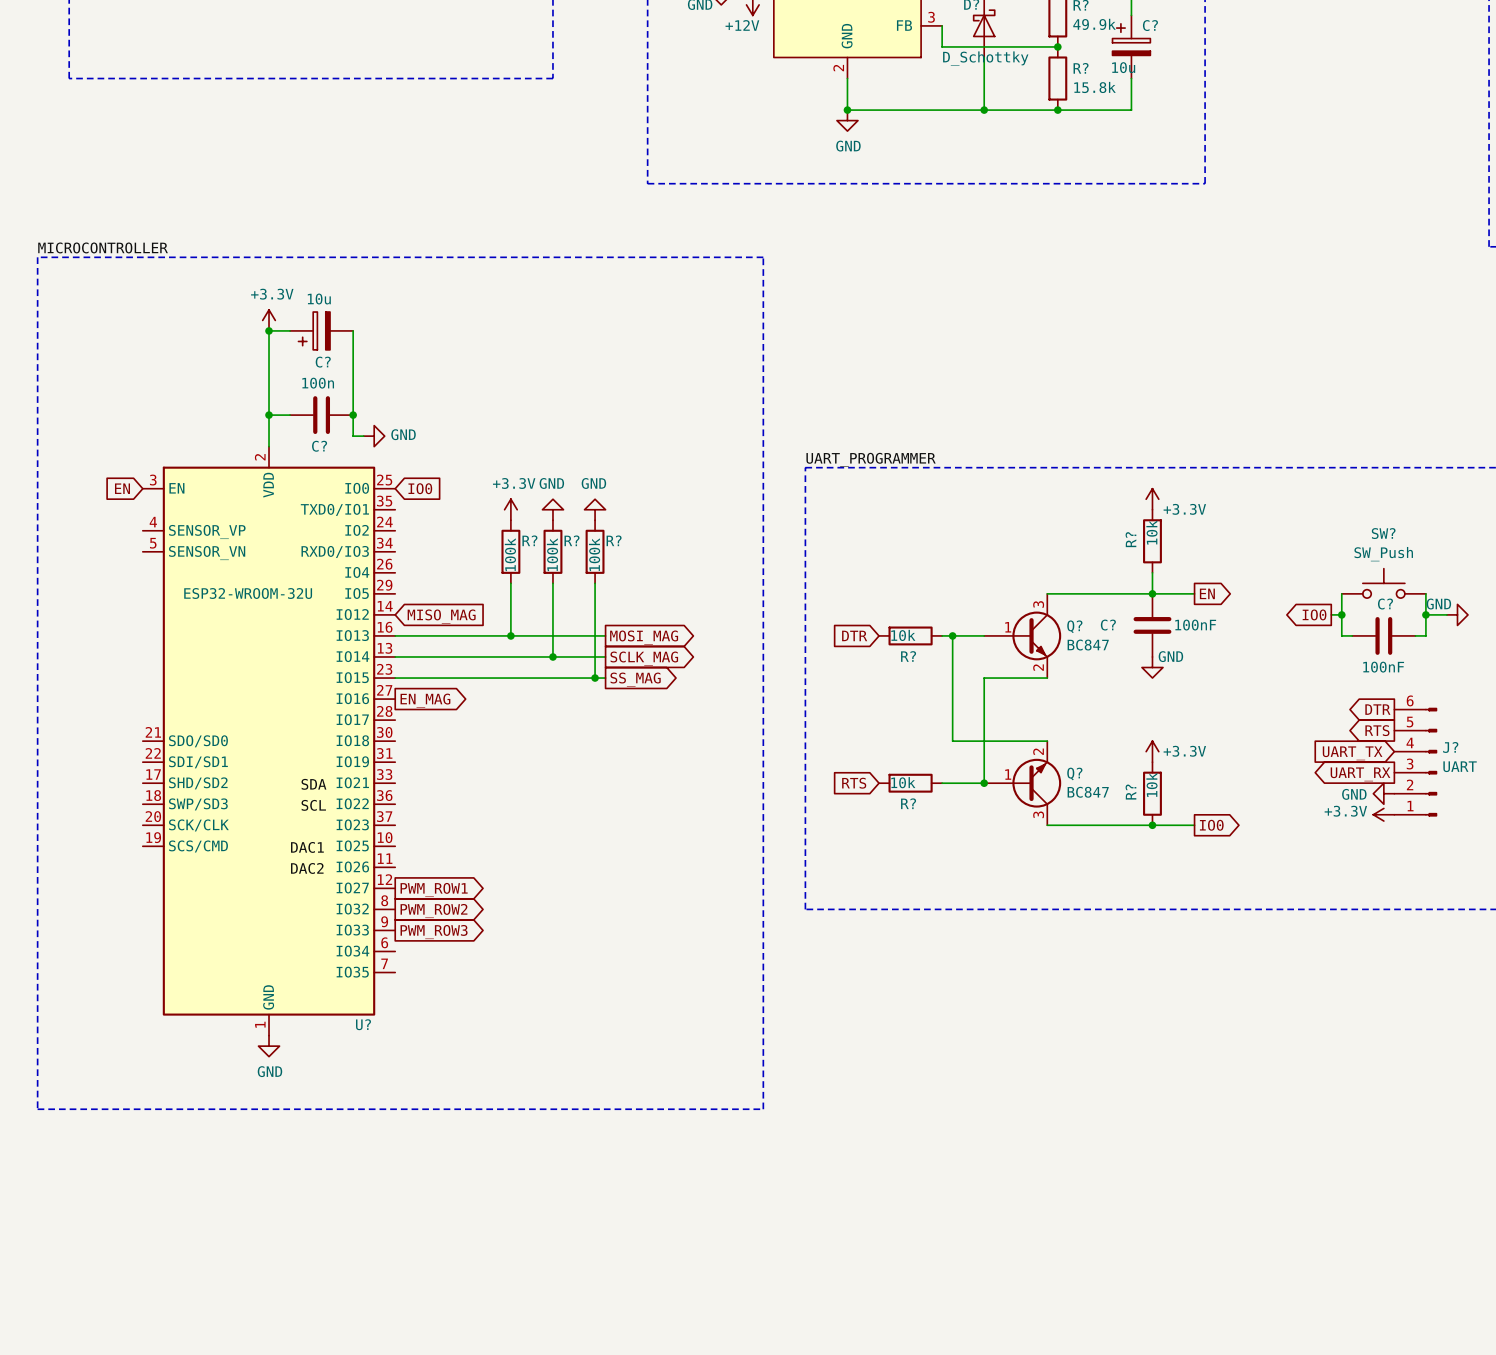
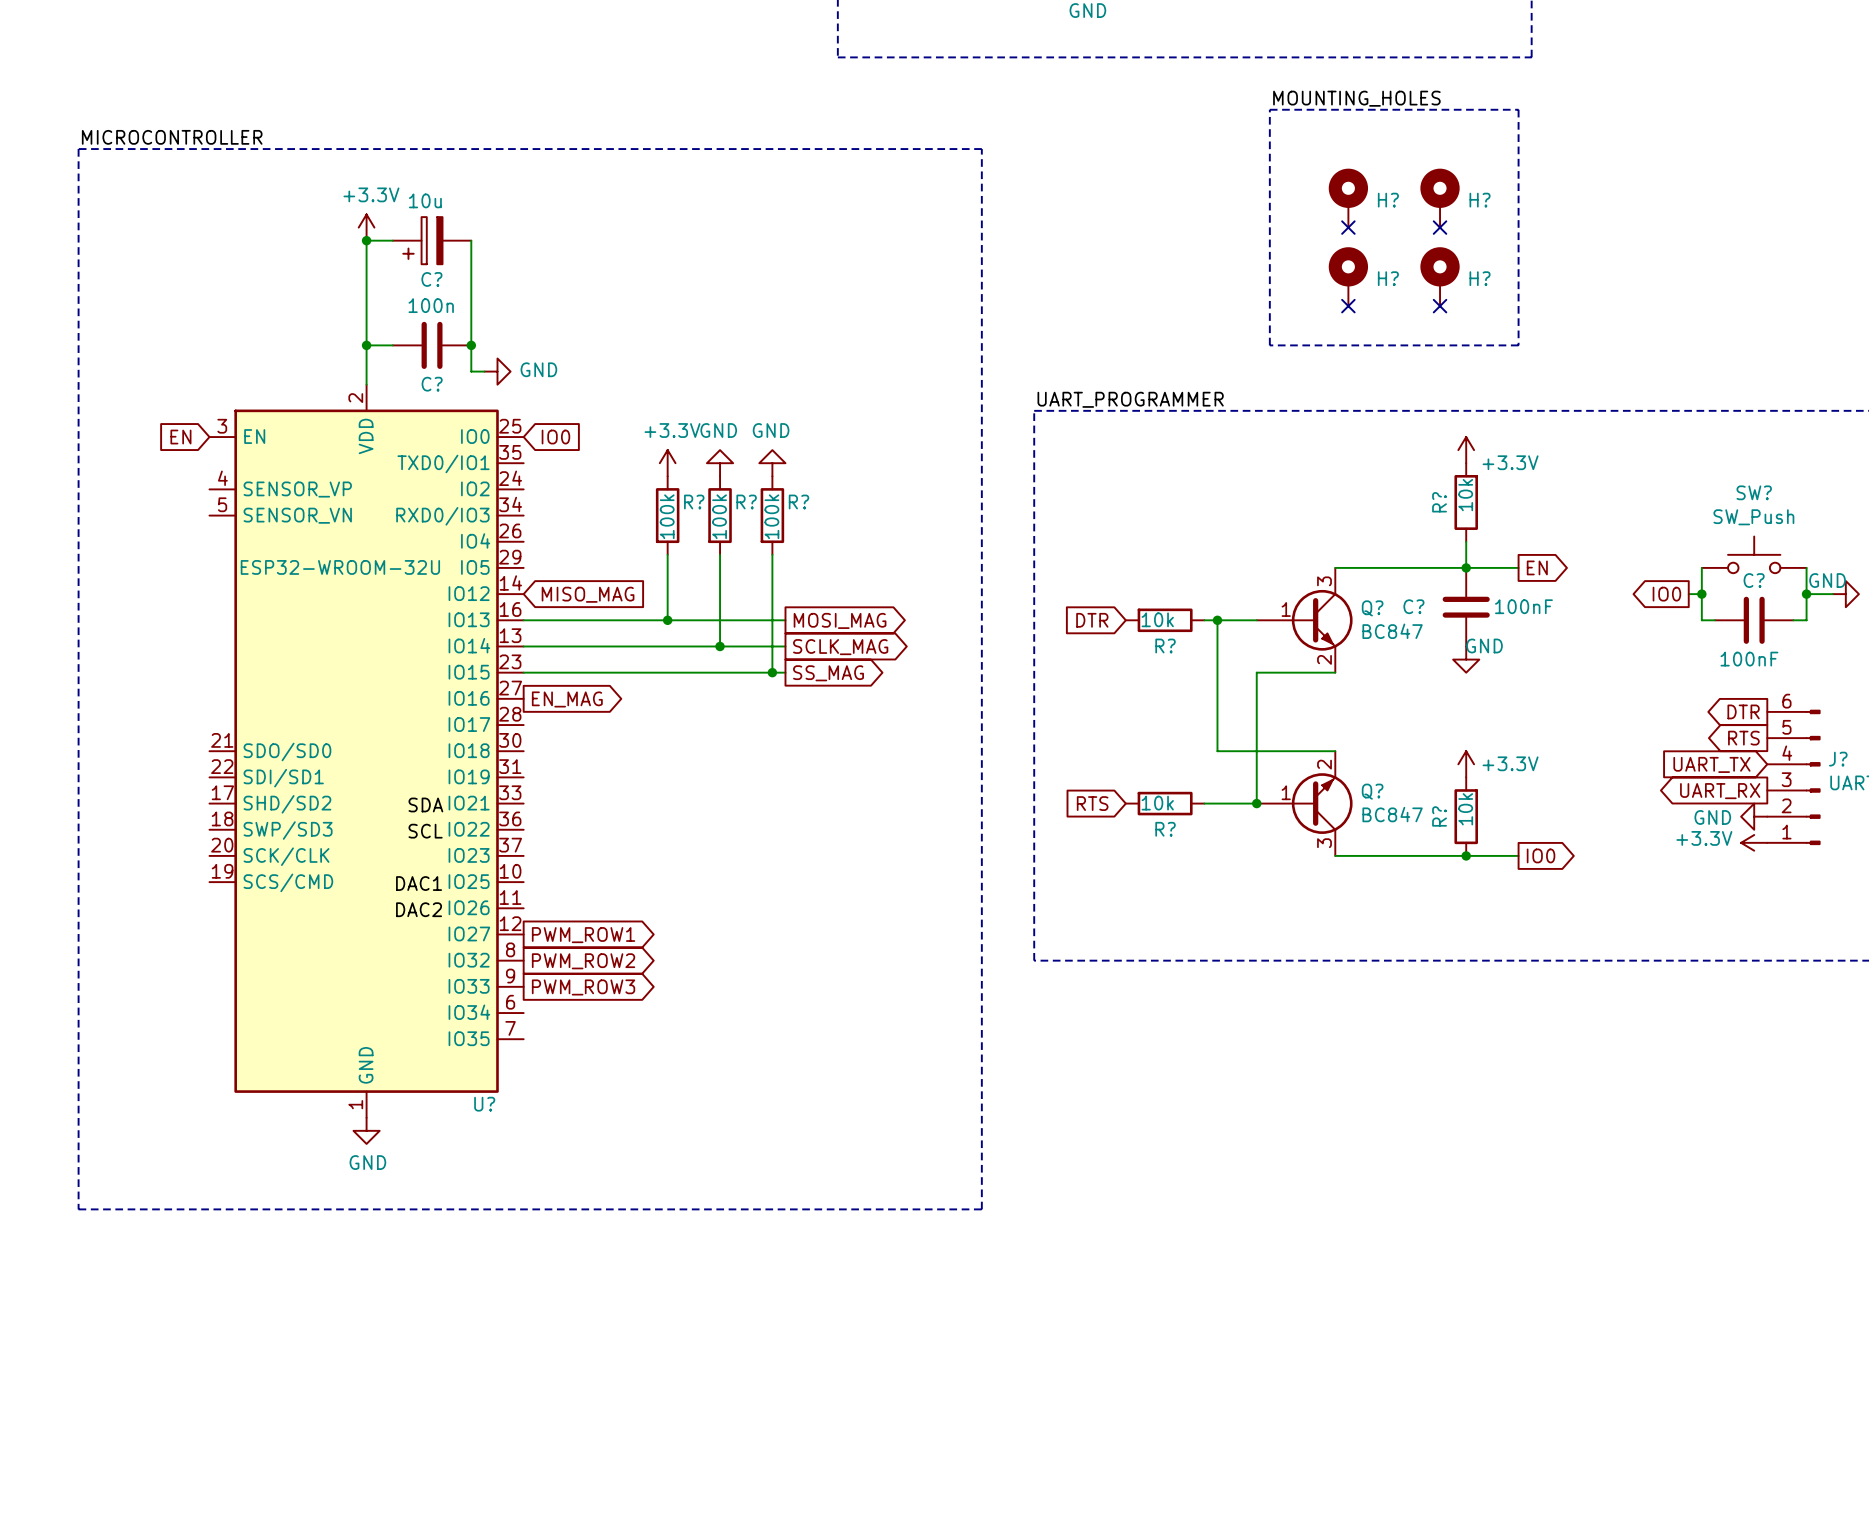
label: none -> MOUNTING_HOLES (1356, 98)
line: none -> (1269, 109) (1269, 345) (1518, 345) (1518, 109) (1269, 109)
H?: none -> (1348, 198)
H?: none -> (1440, 198)
no-connect mark: none -> (1348, 227)
no-connect mark: none -> (1440, 227)
H?: none -> (1348, 276)
H?: none -> (1440, 276)
no-connect mark: none -> (1348, 306)
no-connect mark: none -> (1440, 306)

